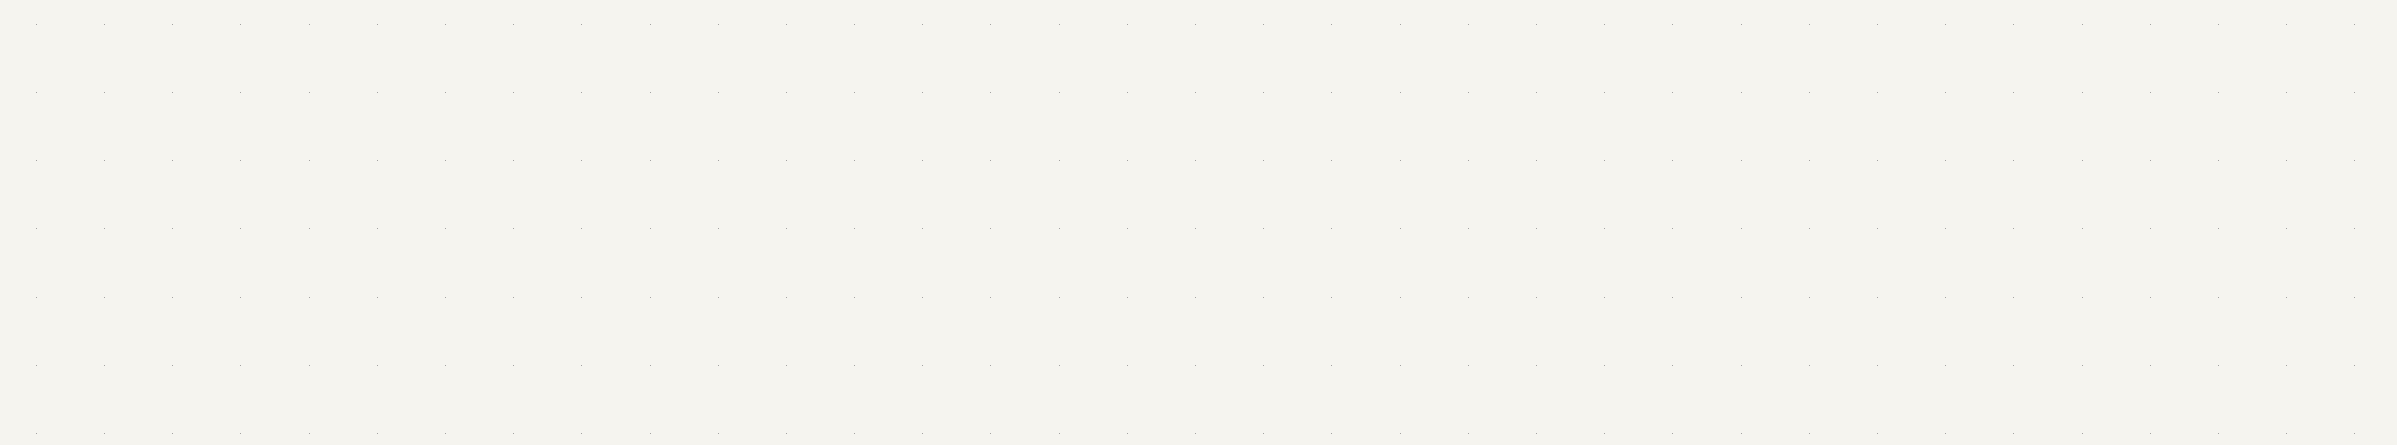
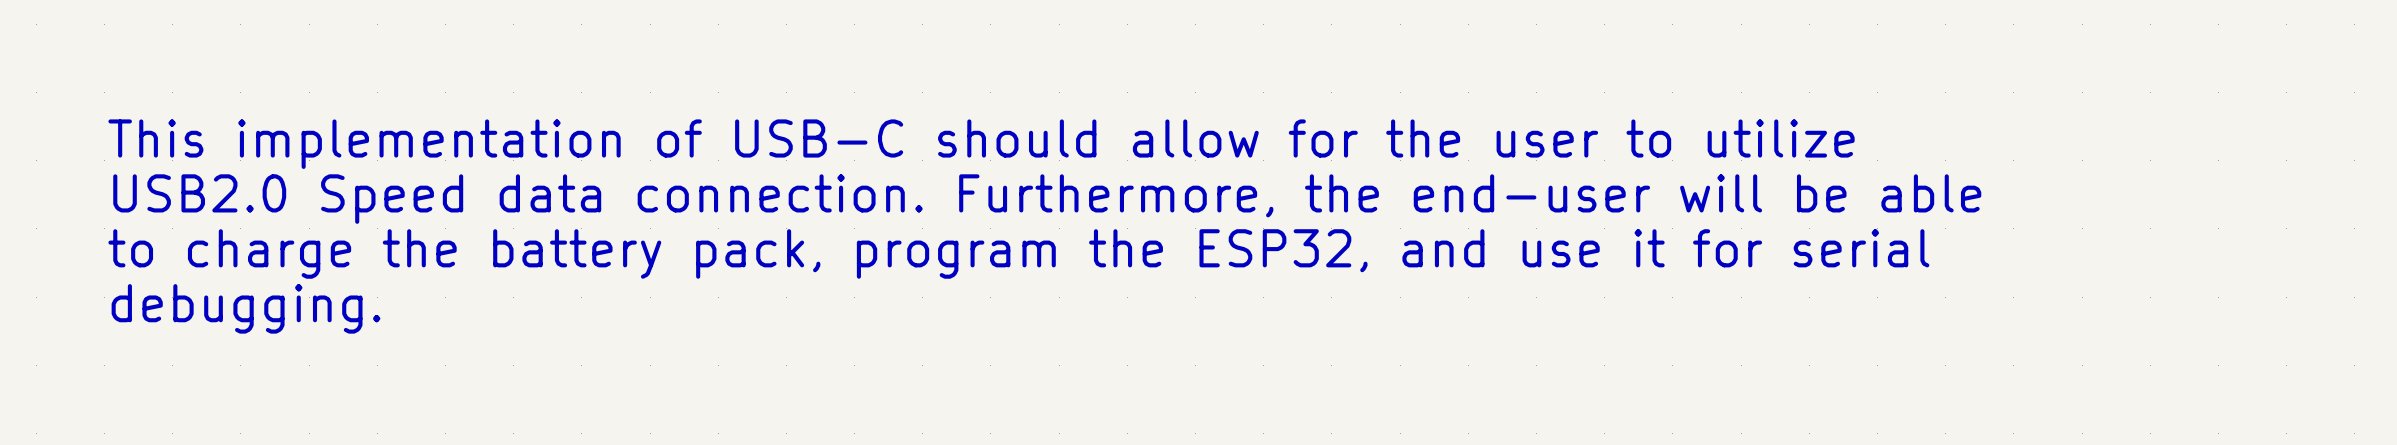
text: none -> This implementation of USB-C should allow for the user to utilize (981, 144)
text: none -> USB2.0 Speed data connection. Furthermore, the end-user will be able (1047, 199)
text: none -> to charge the battery pack, program the ESP32, and use it for serial (1018, 253)
text: none -> debugging. (245, 308)

